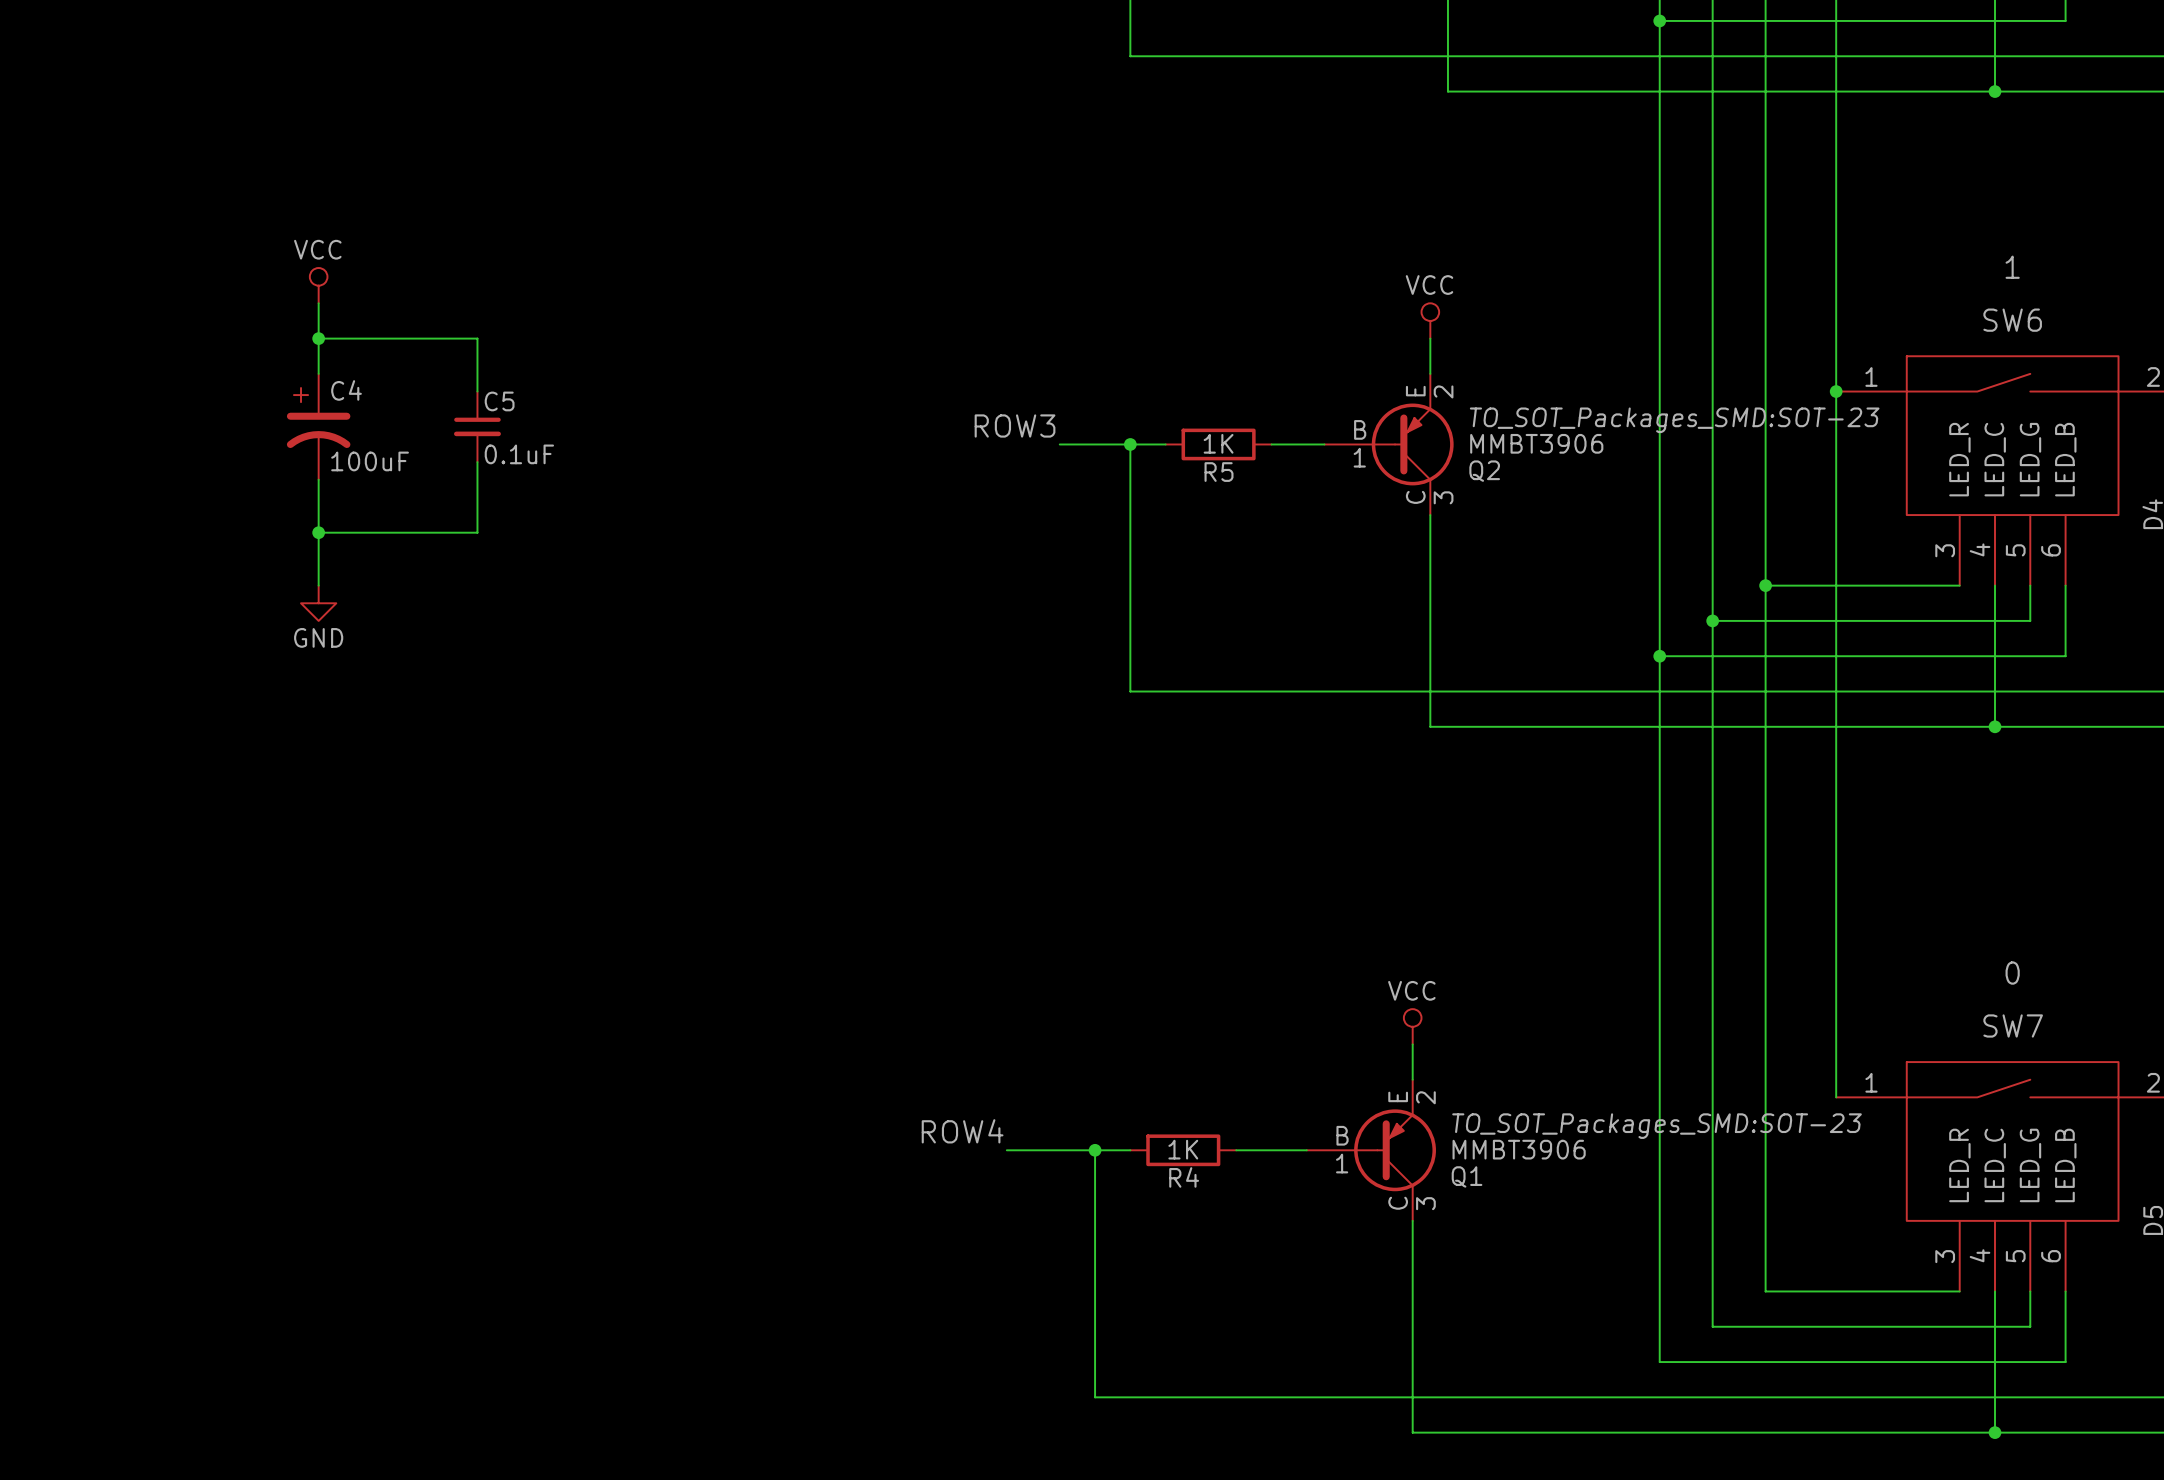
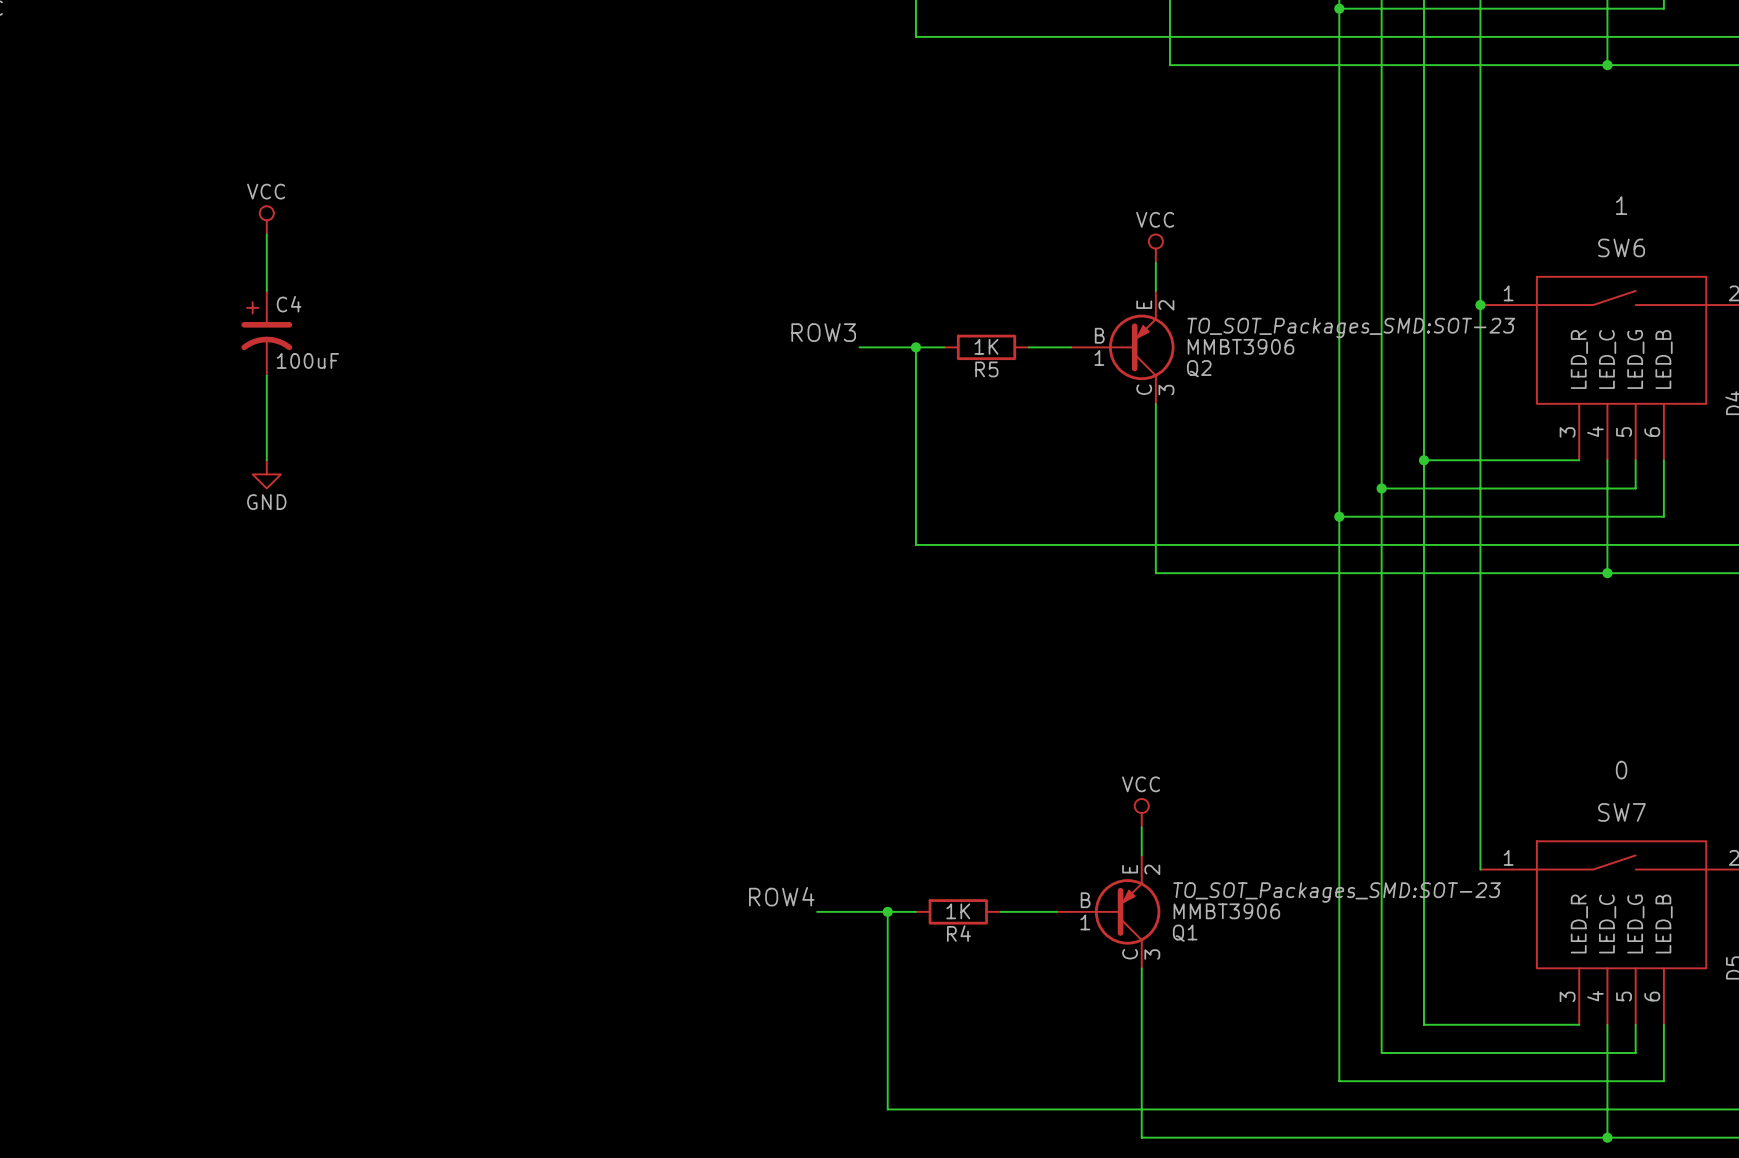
wire: (318, 338) (477, 338) (477, 391) -> none
junction: (318, 338) -> none
C5: 0.1uF (477, 426) -> none
wire: (477, 462) (477, 532) (318, 532) -> none
junction: (318, 532) -> none

